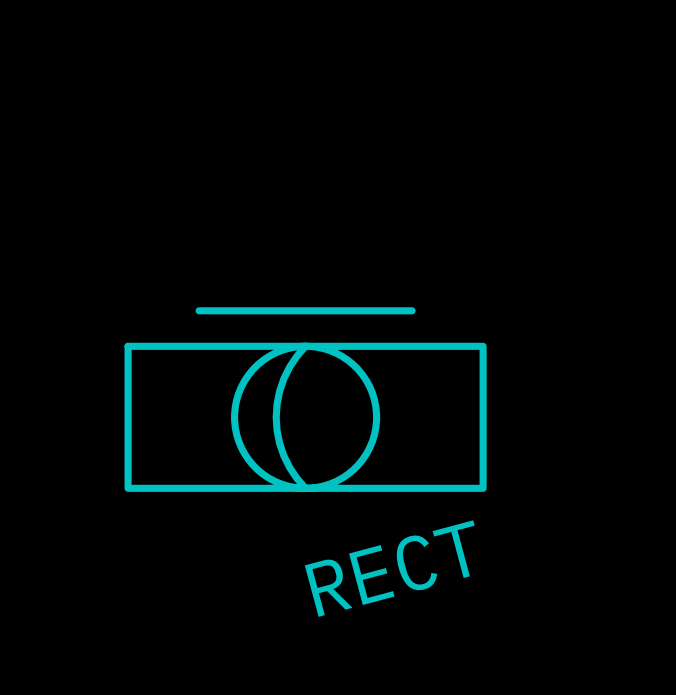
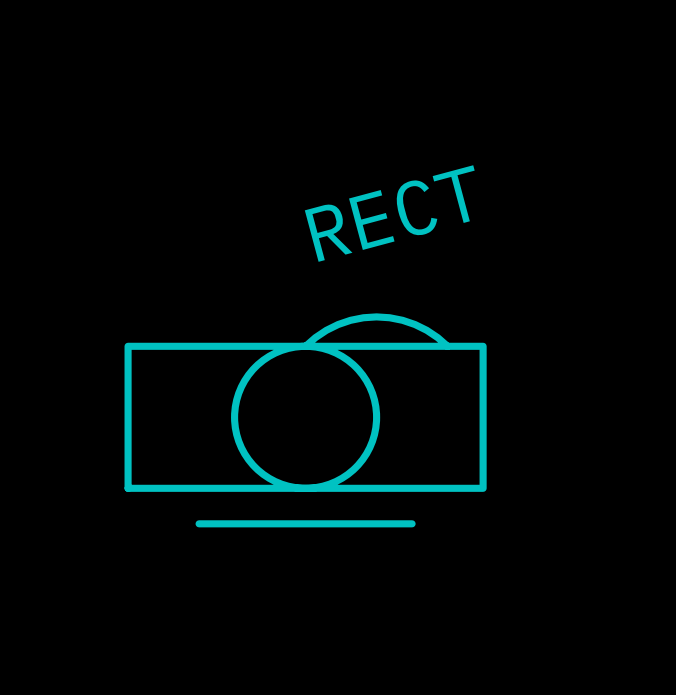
drawing shape: [124, 307, 487, 617] -> [124, 165, 487, 528]

